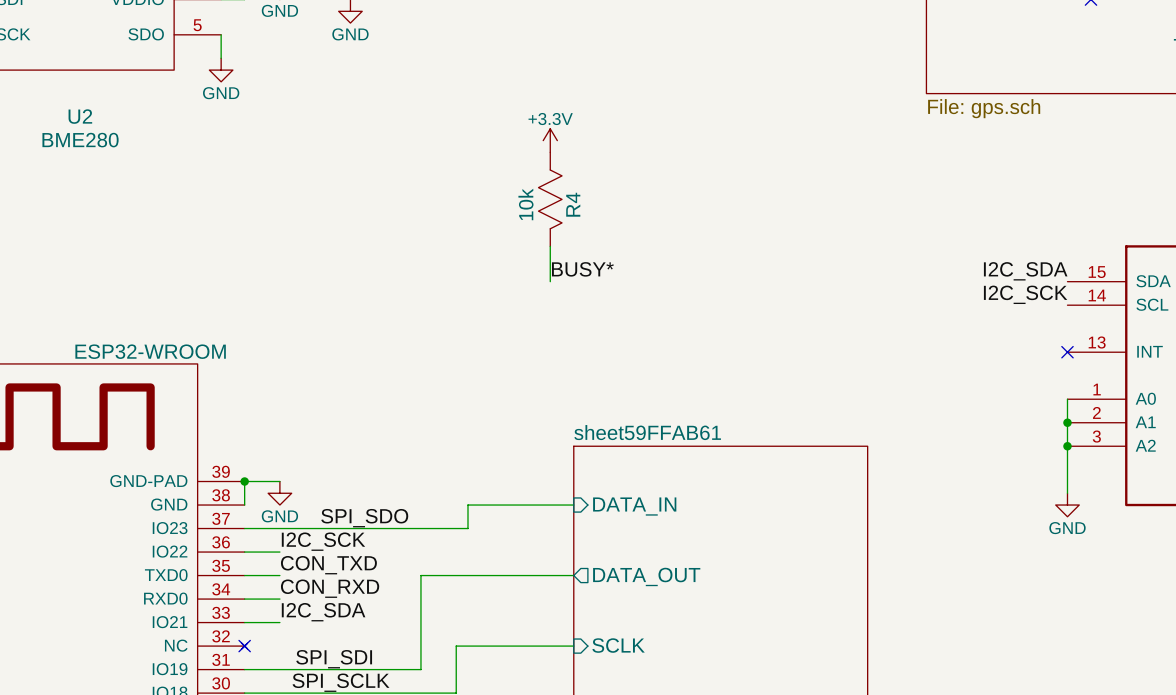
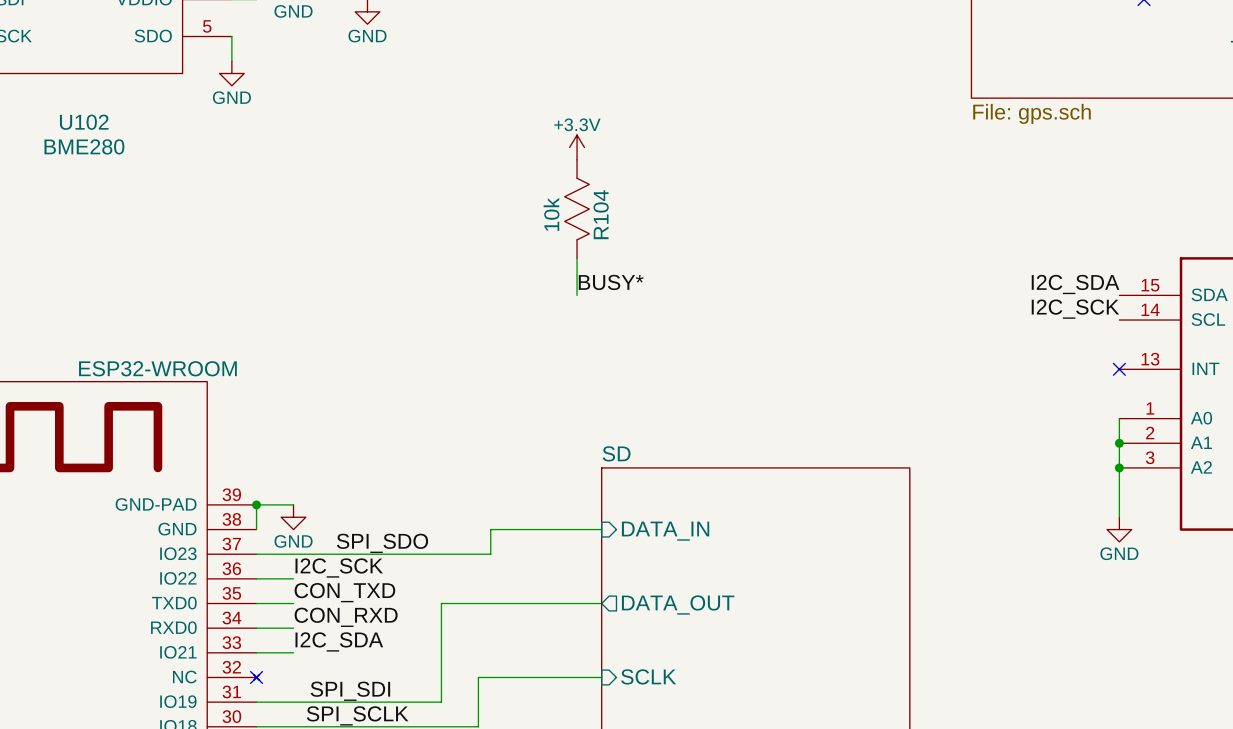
U2 name: U2 (80, 116) -> U102 (84, 122)
R4 name: R4 (573, 204) -> R104 (601, 214)
sheet sheet59FFAB61 name: sheet59FFAB61 (647, 432) -> SD (616, 453)

